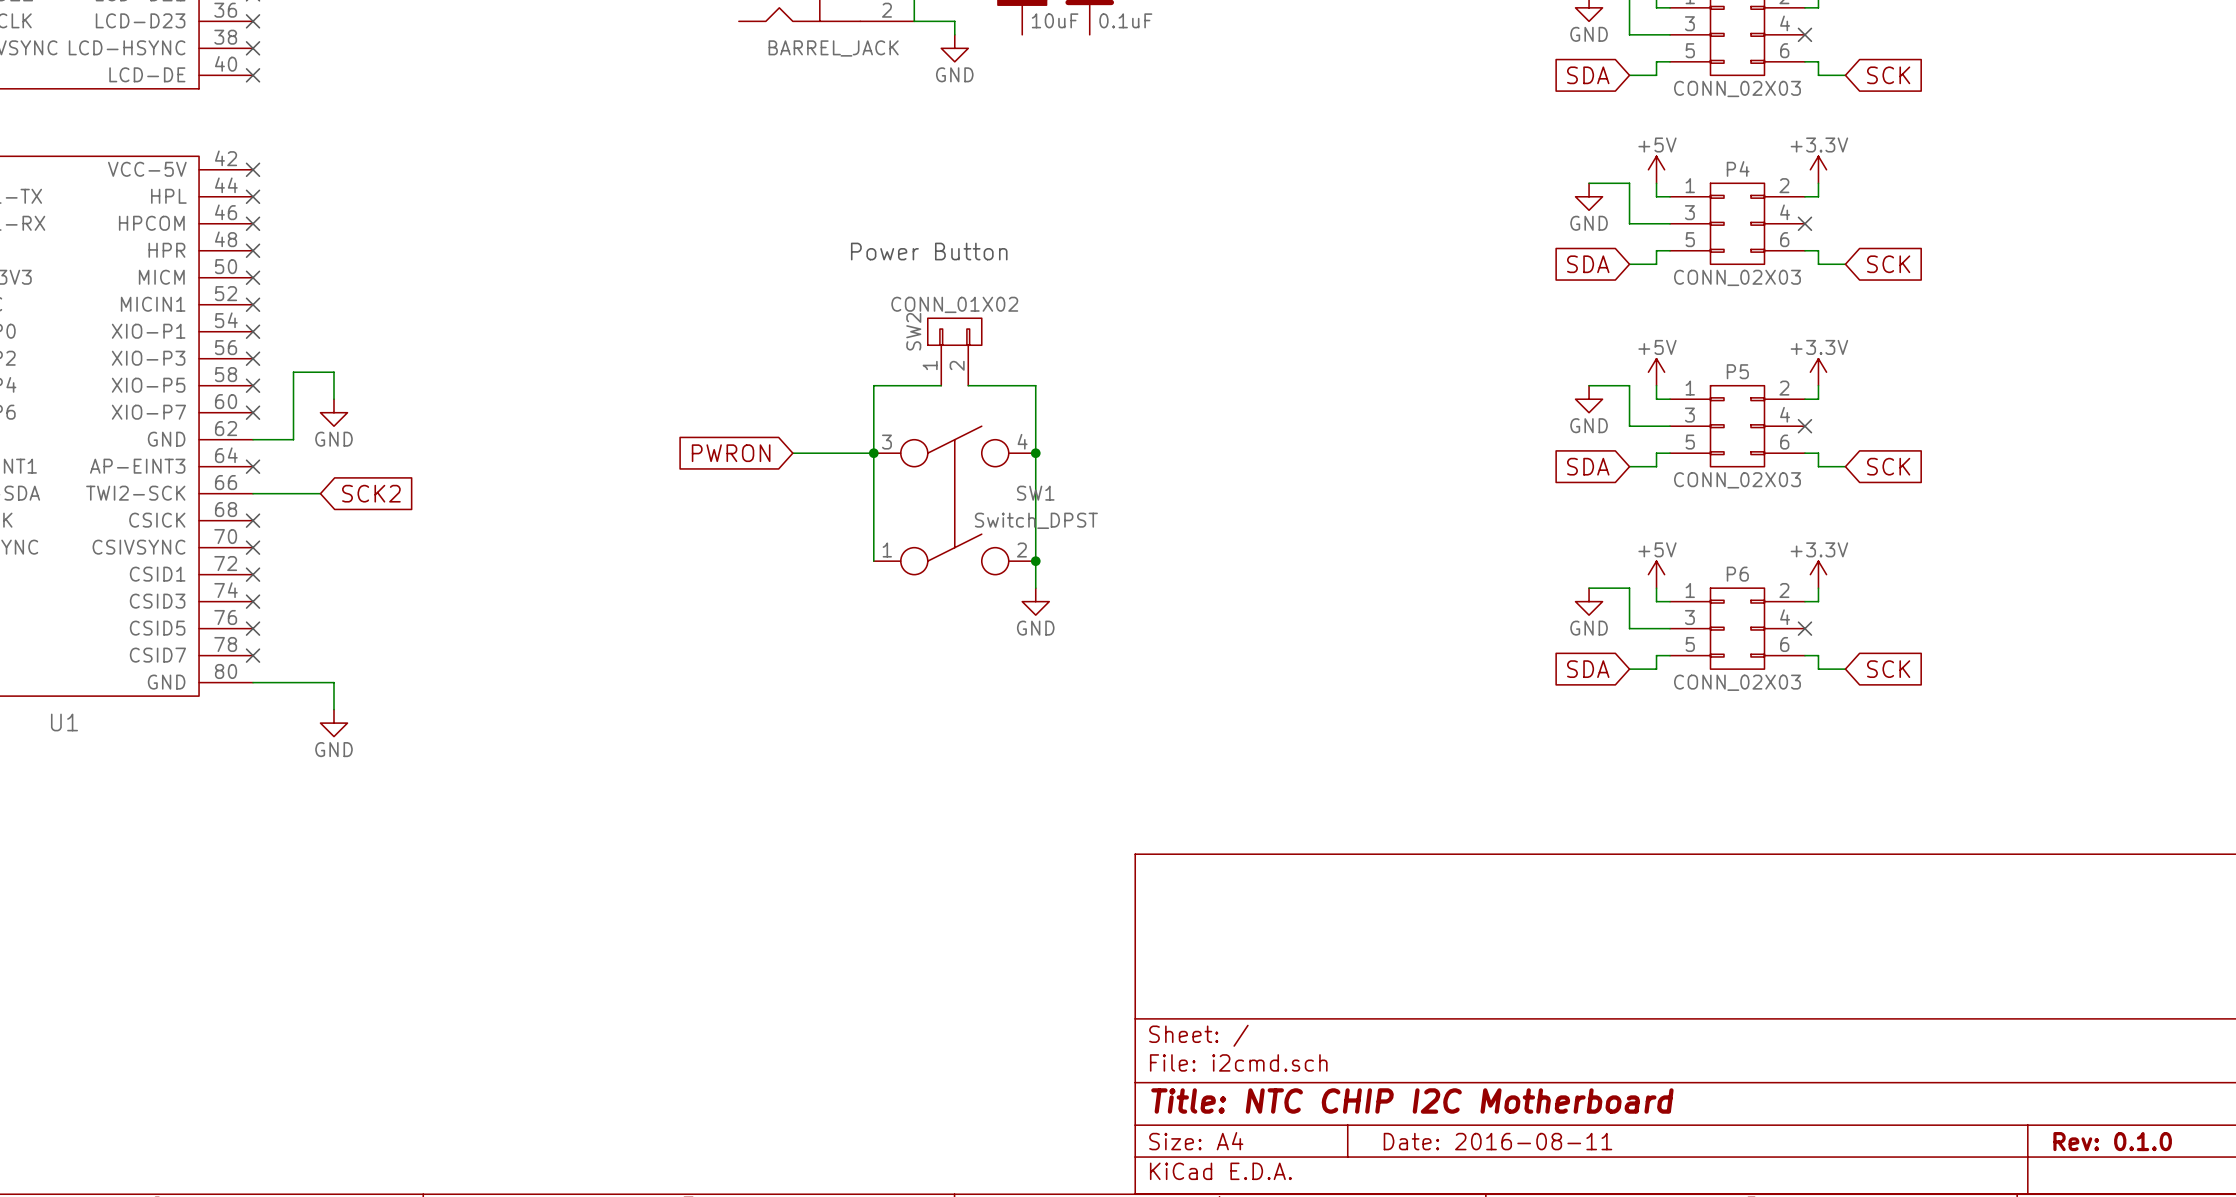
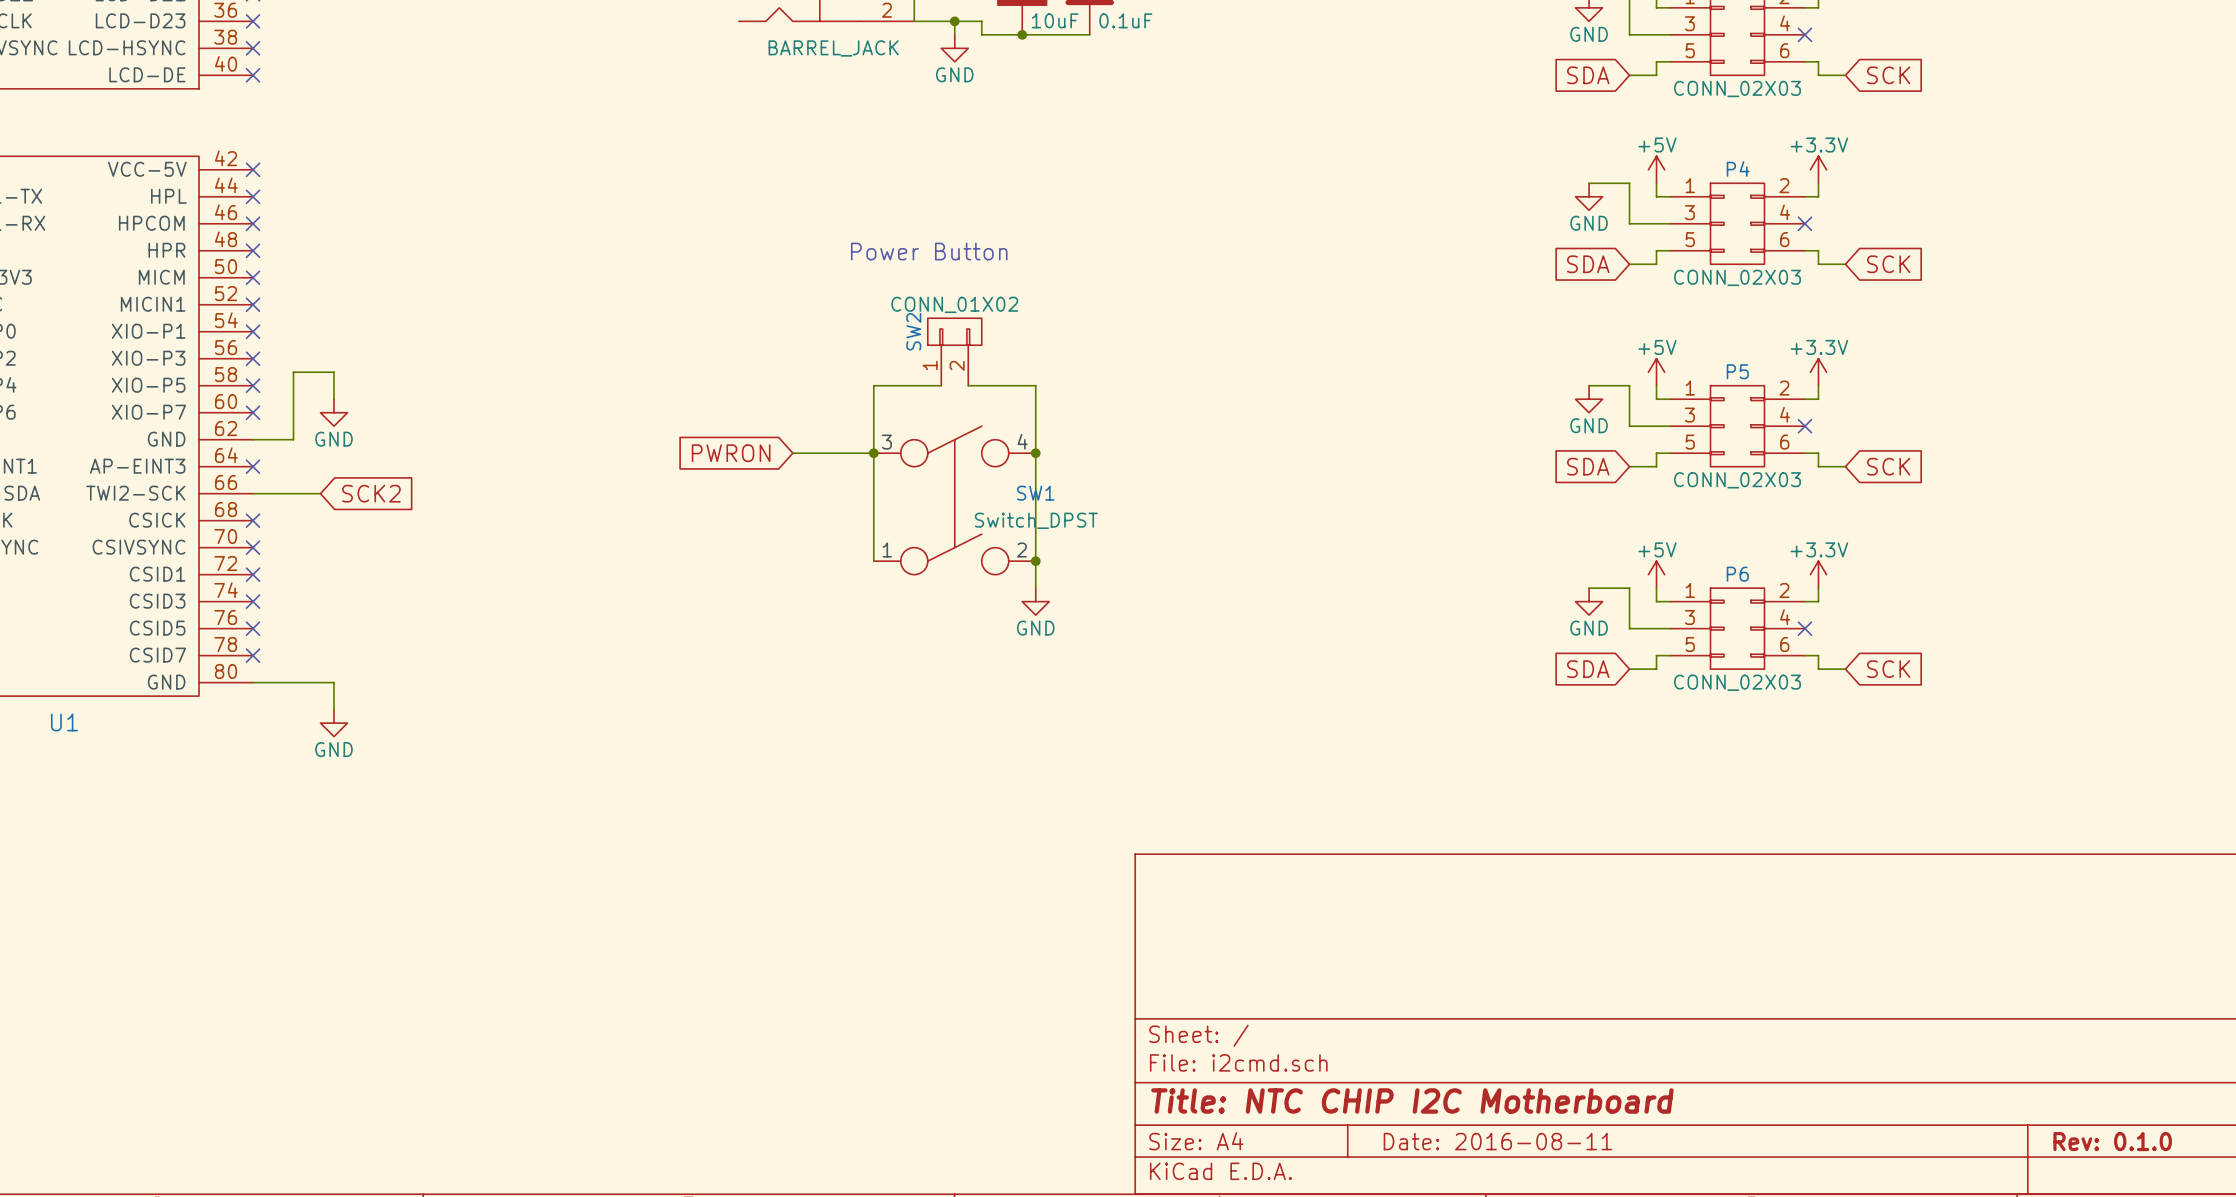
wire: none -> (954, 21) (981, 21) (981, 34) (1089, 34)
junction: none -> (954, 21)
junction: none -> (1022, 34)

